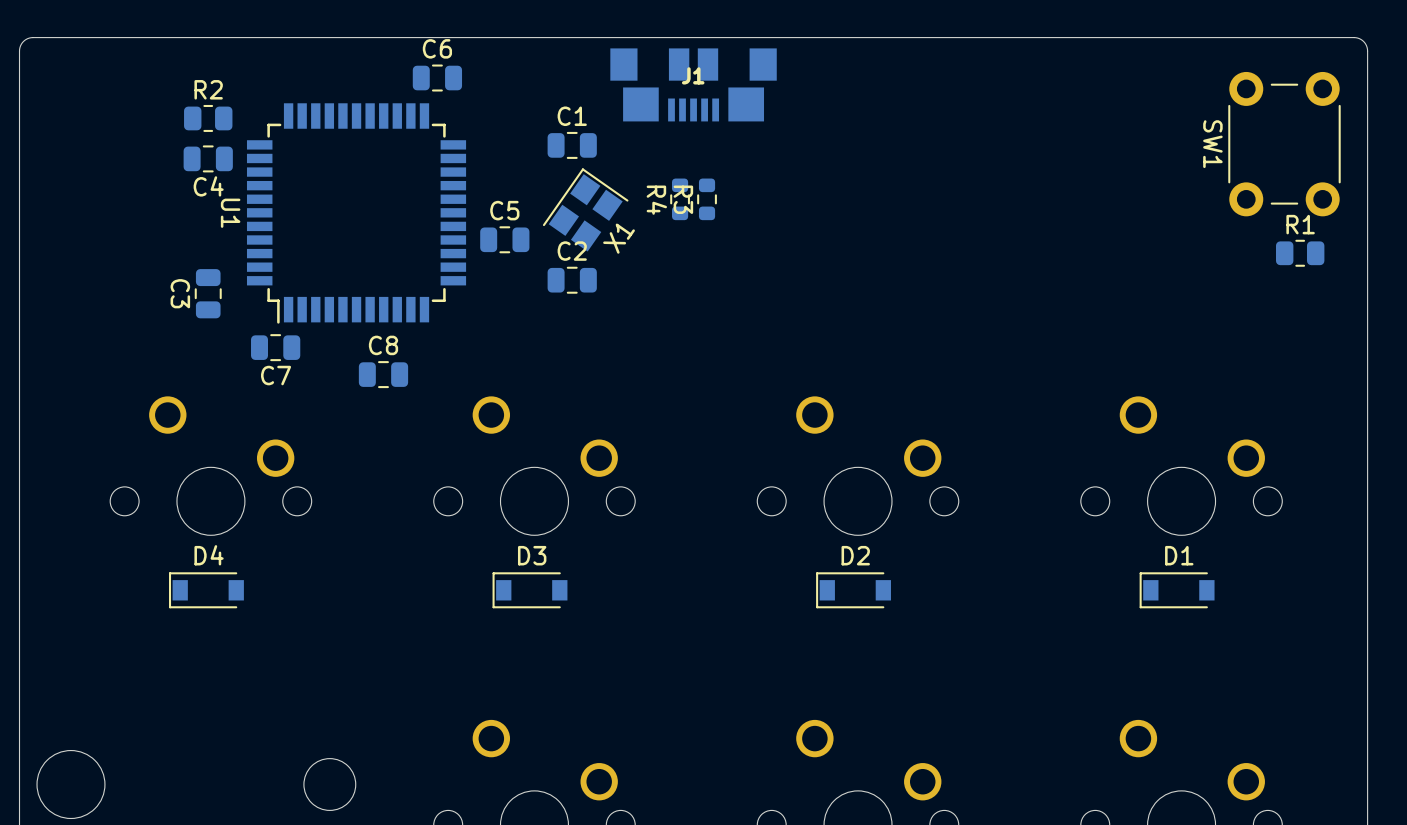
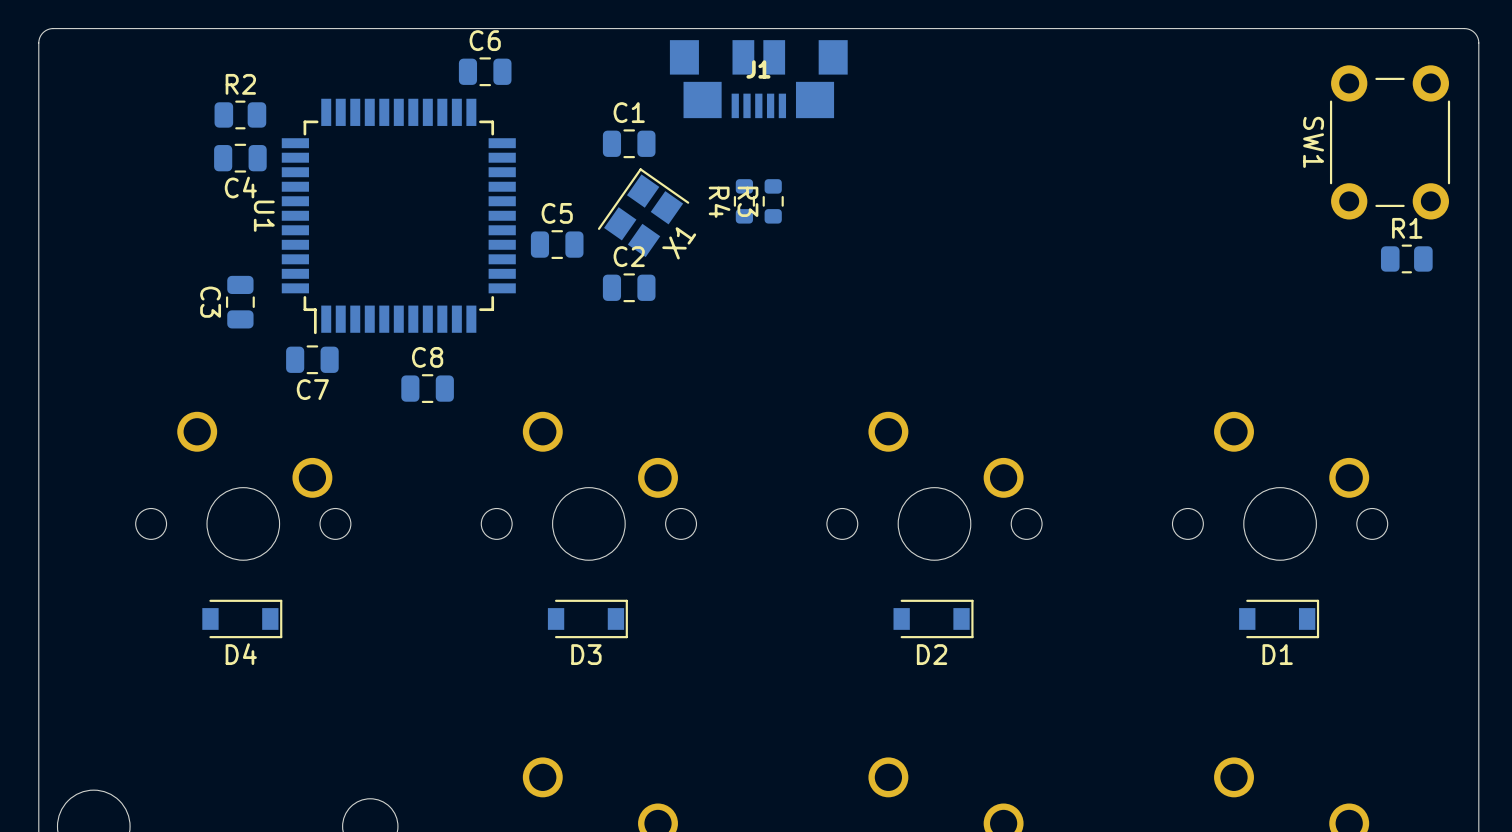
D4 rotation: 0° (206, 590) -> 180° (242, 618)
D3 rotation: 0° (529, 590) -> 180° (587, 618)
D2 rotation: 0° (853, 590) -> 180° (933, 618)
D1 rotation: 0° (1177, 590) -> 180° (1279, 618)

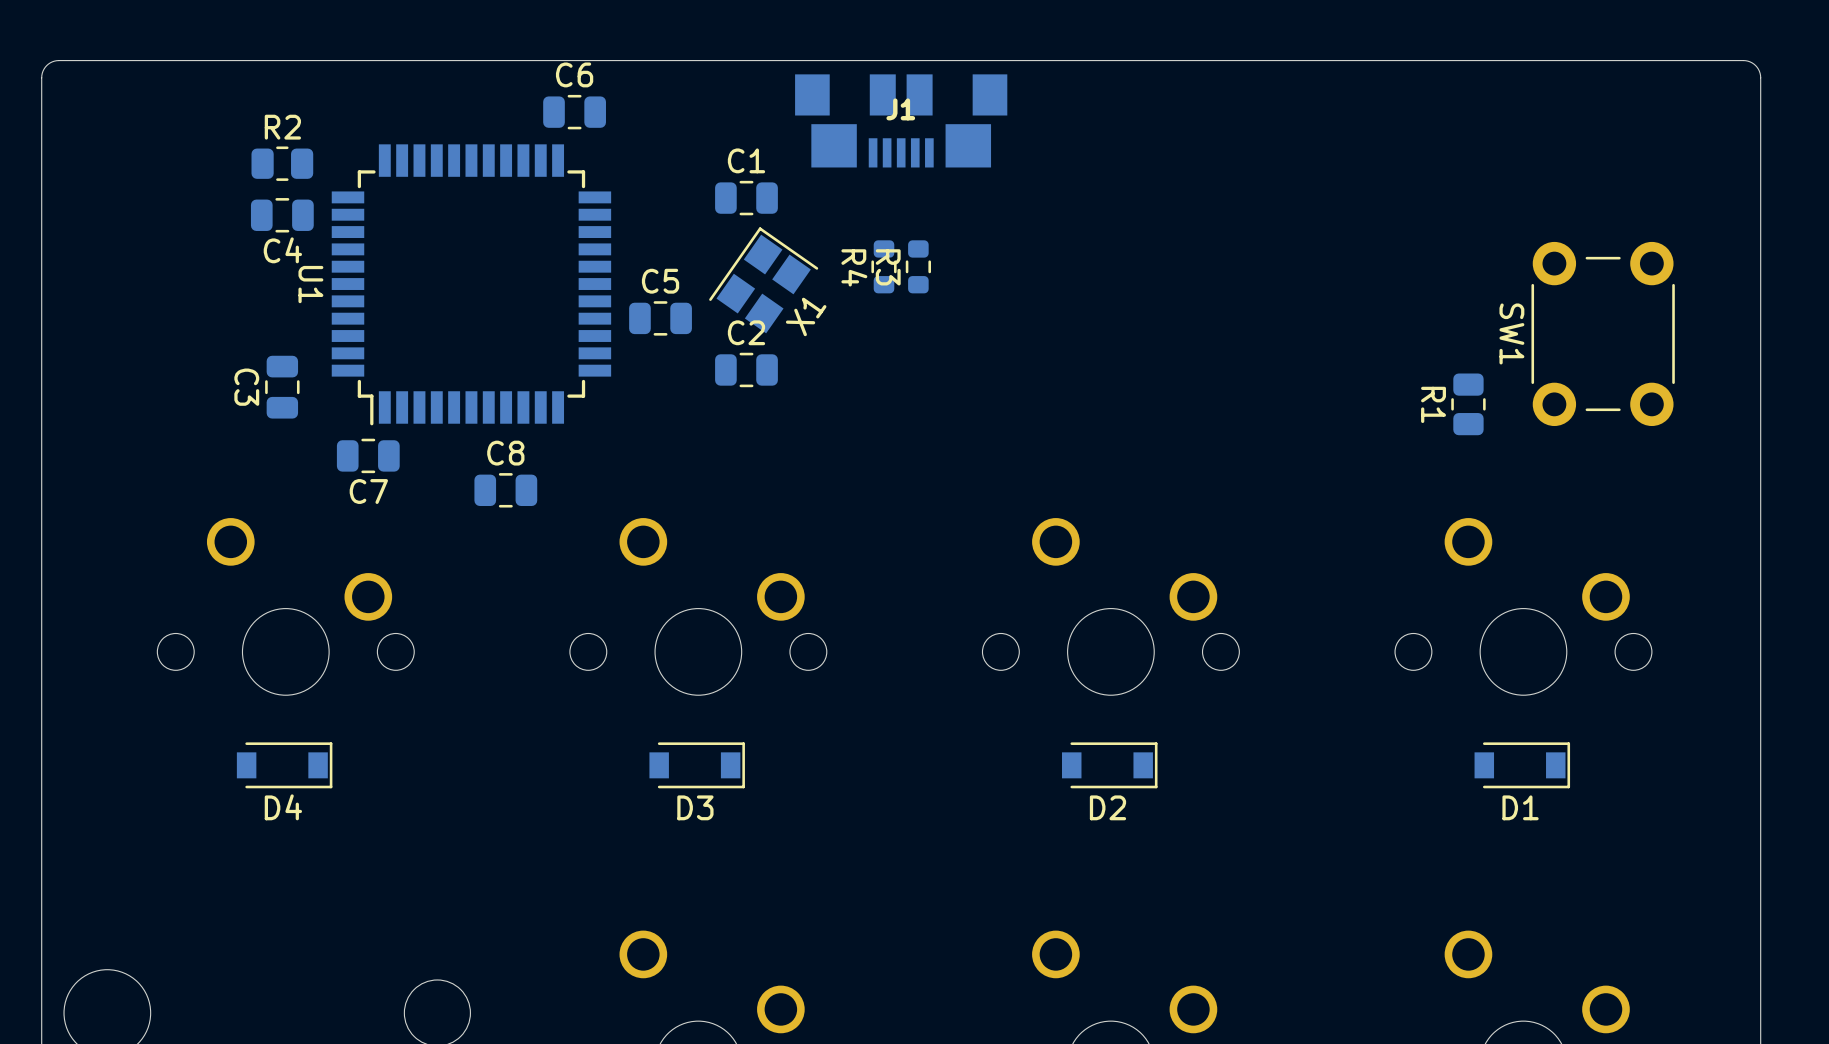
SW1 position: (1390, 142) -> (1603, 333)
R1 name position: R1 (1407, 228) -> R1 (1433, 404)
R1 rotation: 0° (1406, 258) -> 90° clockwise (1468, 404)
R1 position: (1406, 258) -> (1468, 404)

